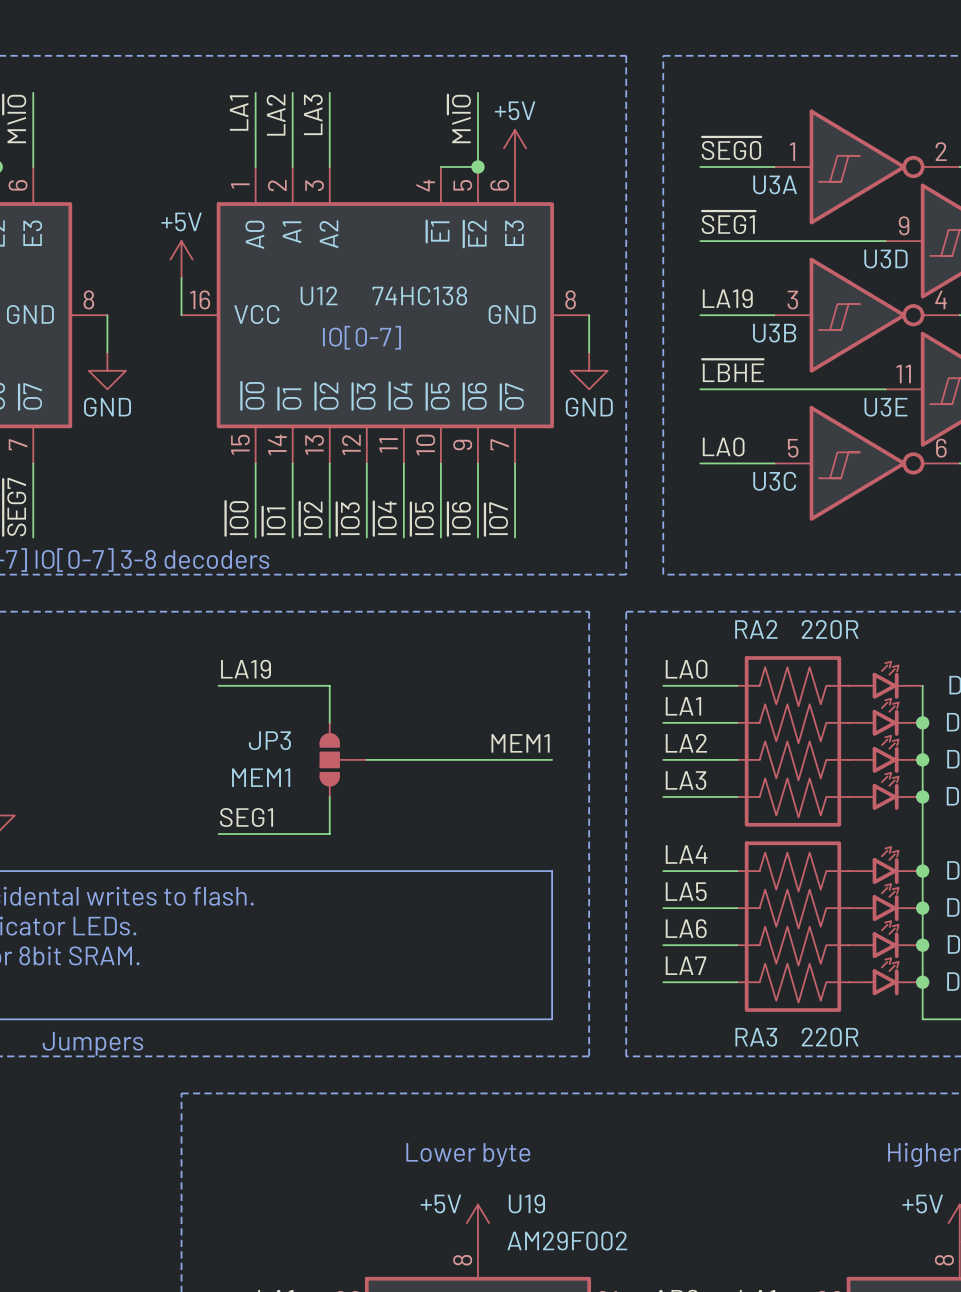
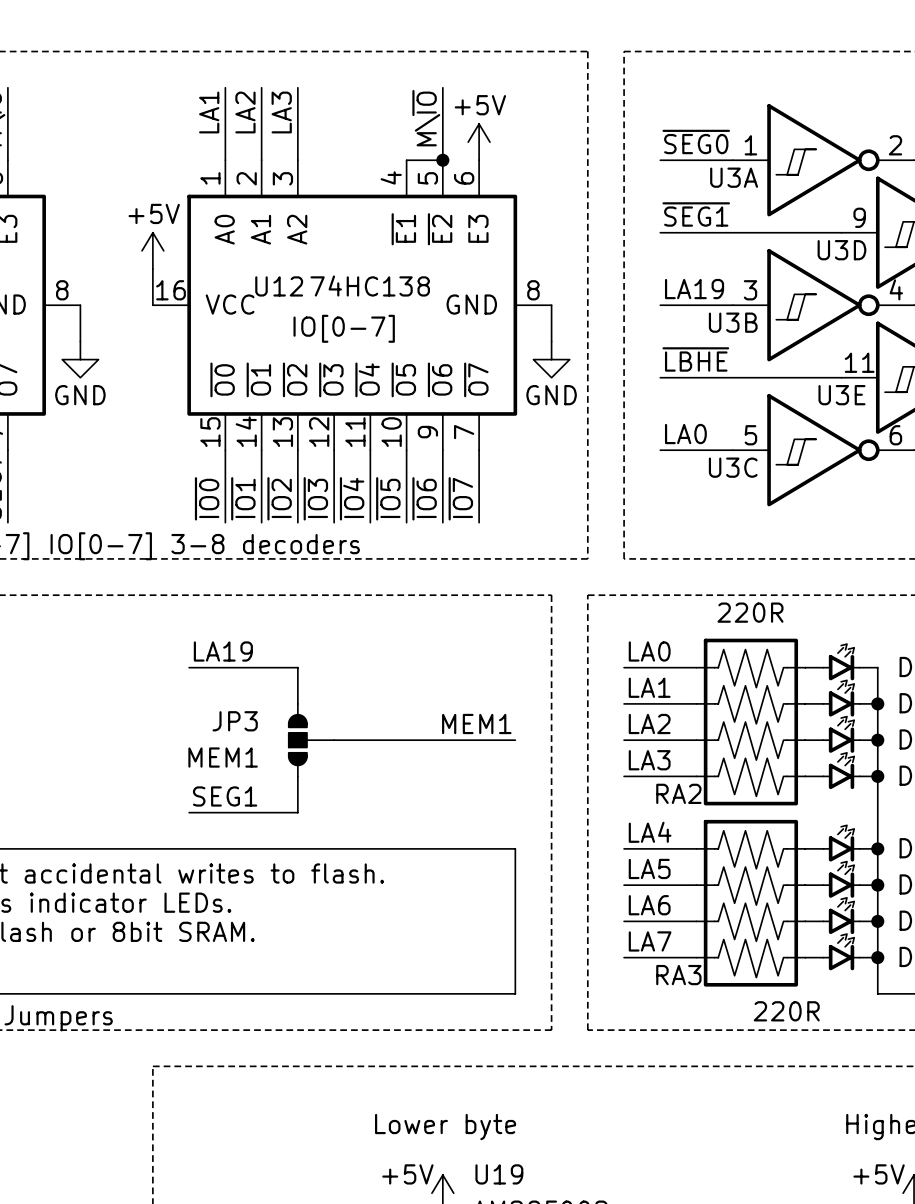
RA2 name position: RA2 (756, 629) -> RA2 (678, 793)
RA2 value position: 220R (830, 629) -> 220R (750, 612)
RA3 name position: RA3 (756, 1037) -> RA3 (678, 975)

